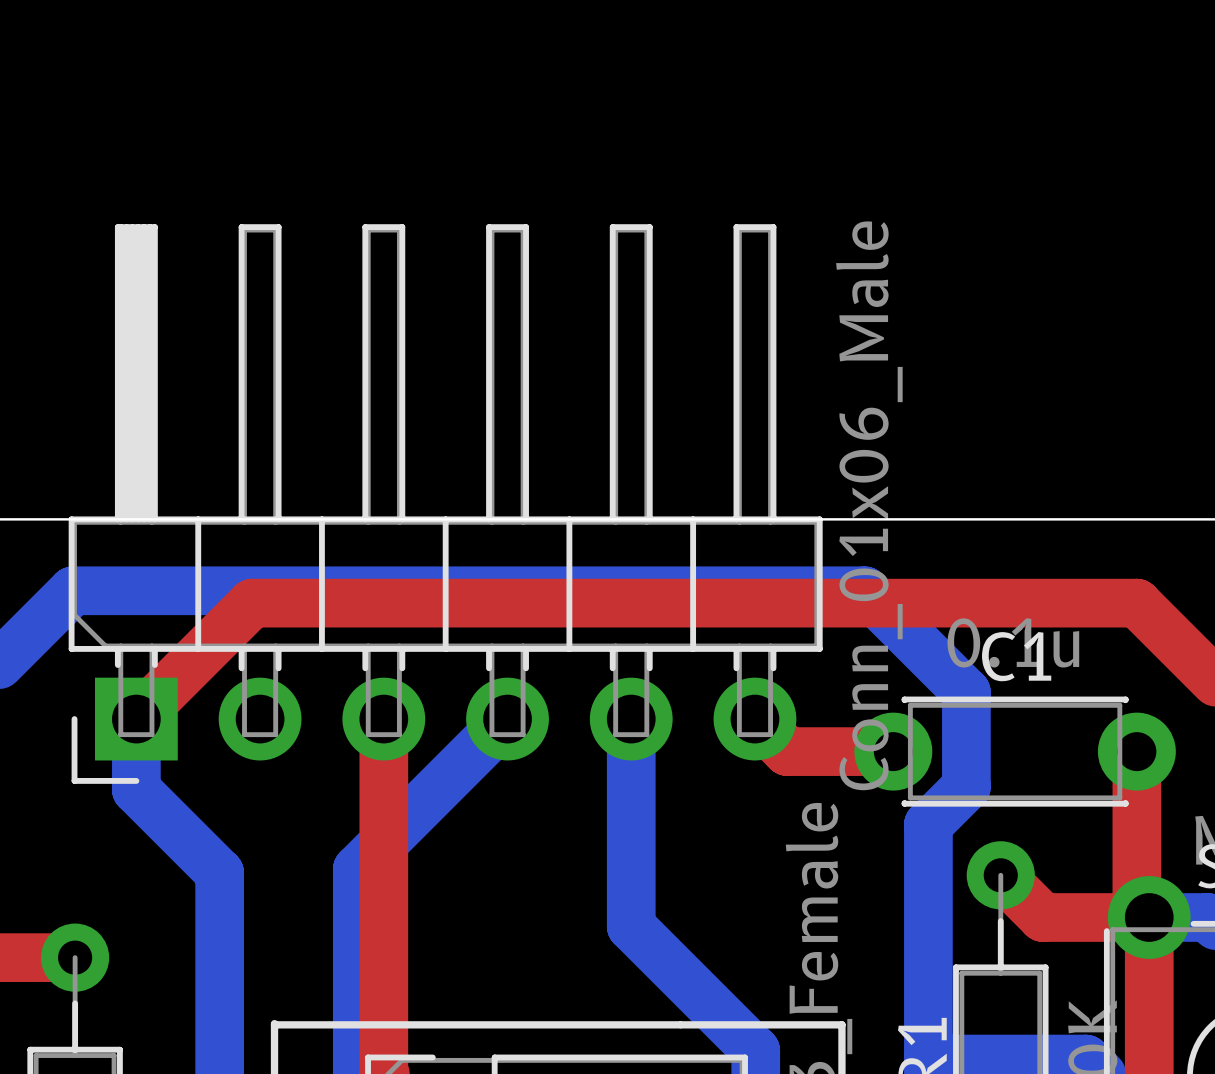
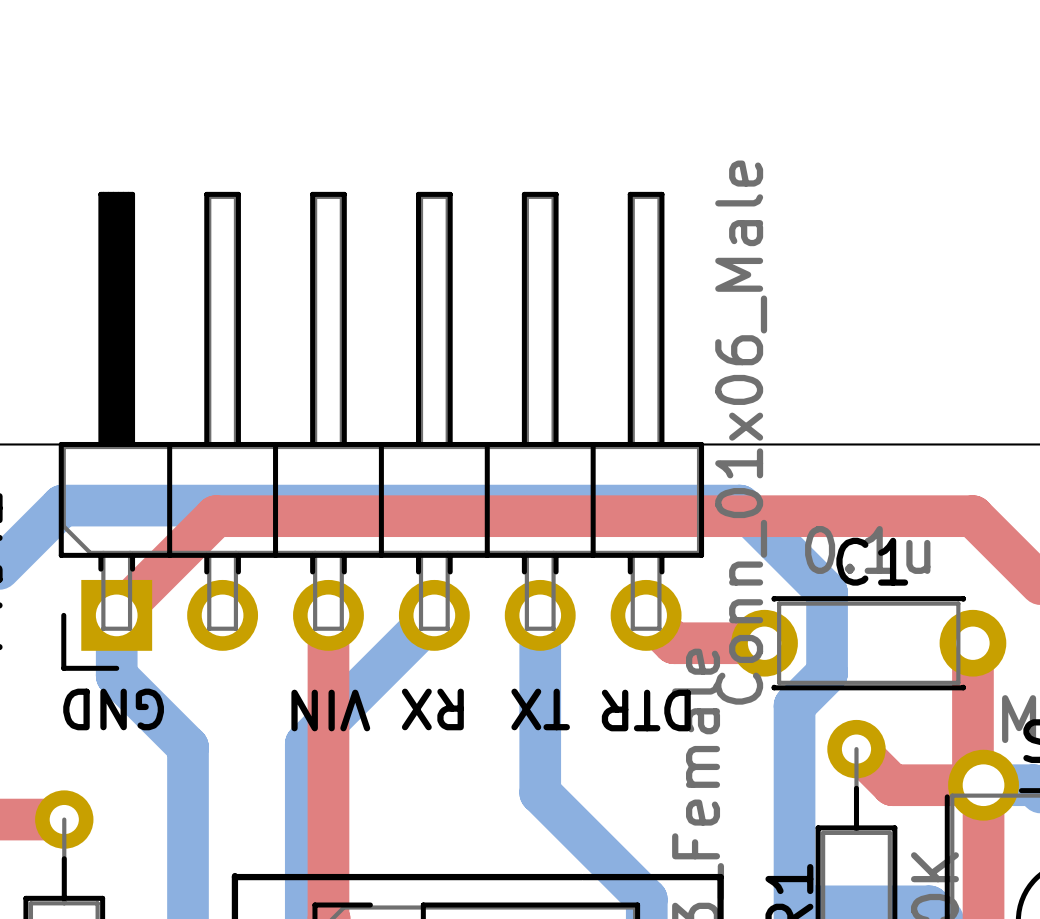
text: none -> GND (113, 709)
text: none -> RX (432, 709)
text: none -> TX (540, 709)
text: none -> VIN (330, 710)
text: none -> DTR (646, 710)

